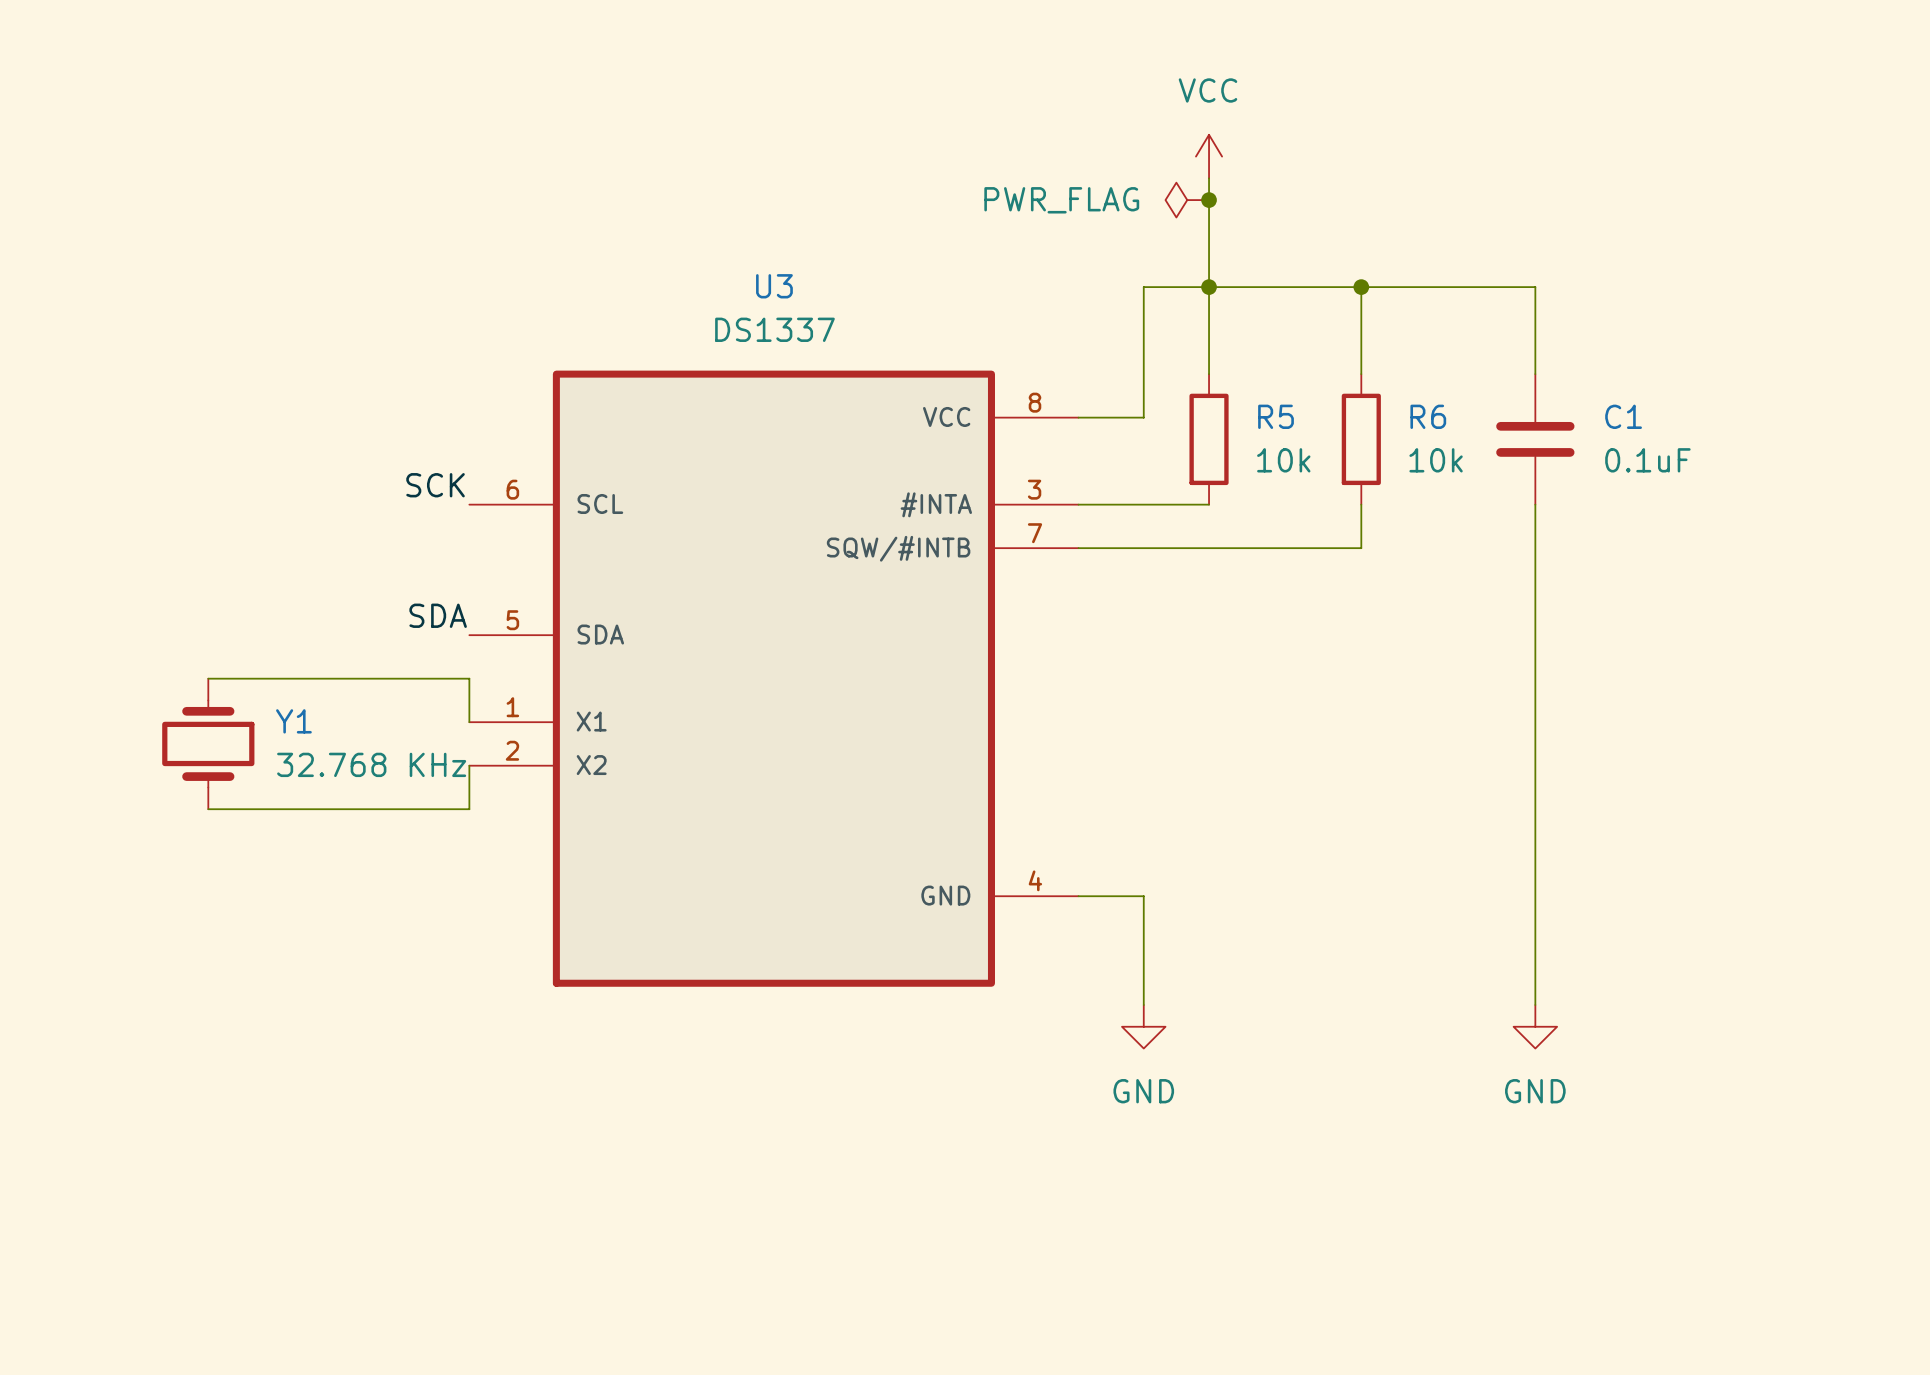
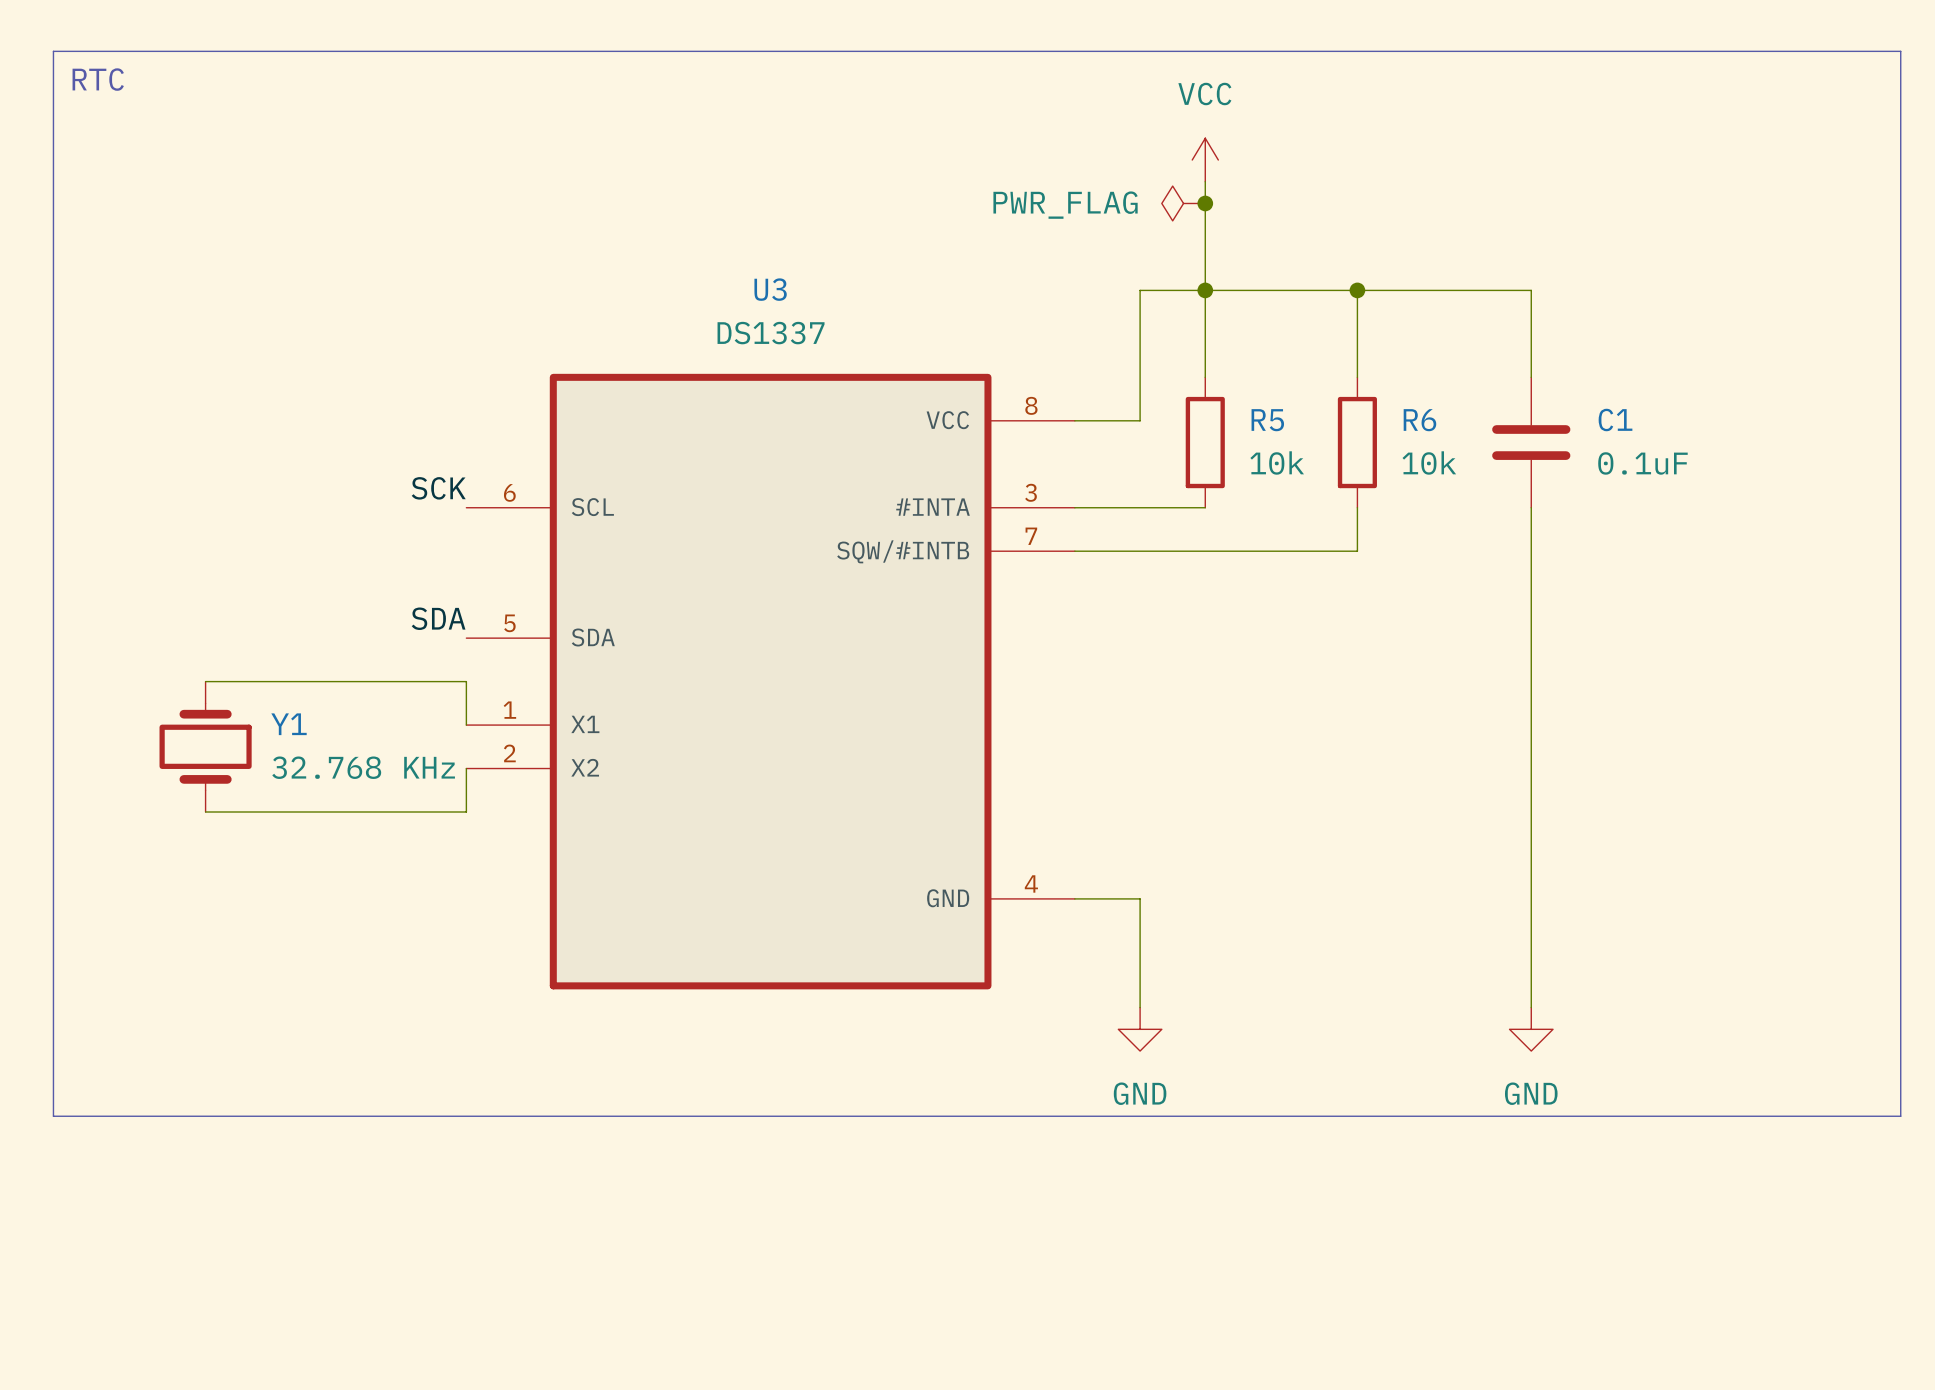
line: none -> (53, 51) (1900, 51) (1900, 1116) (53, 1116) (53, 51)
text: none -> RTC (98, 79)

